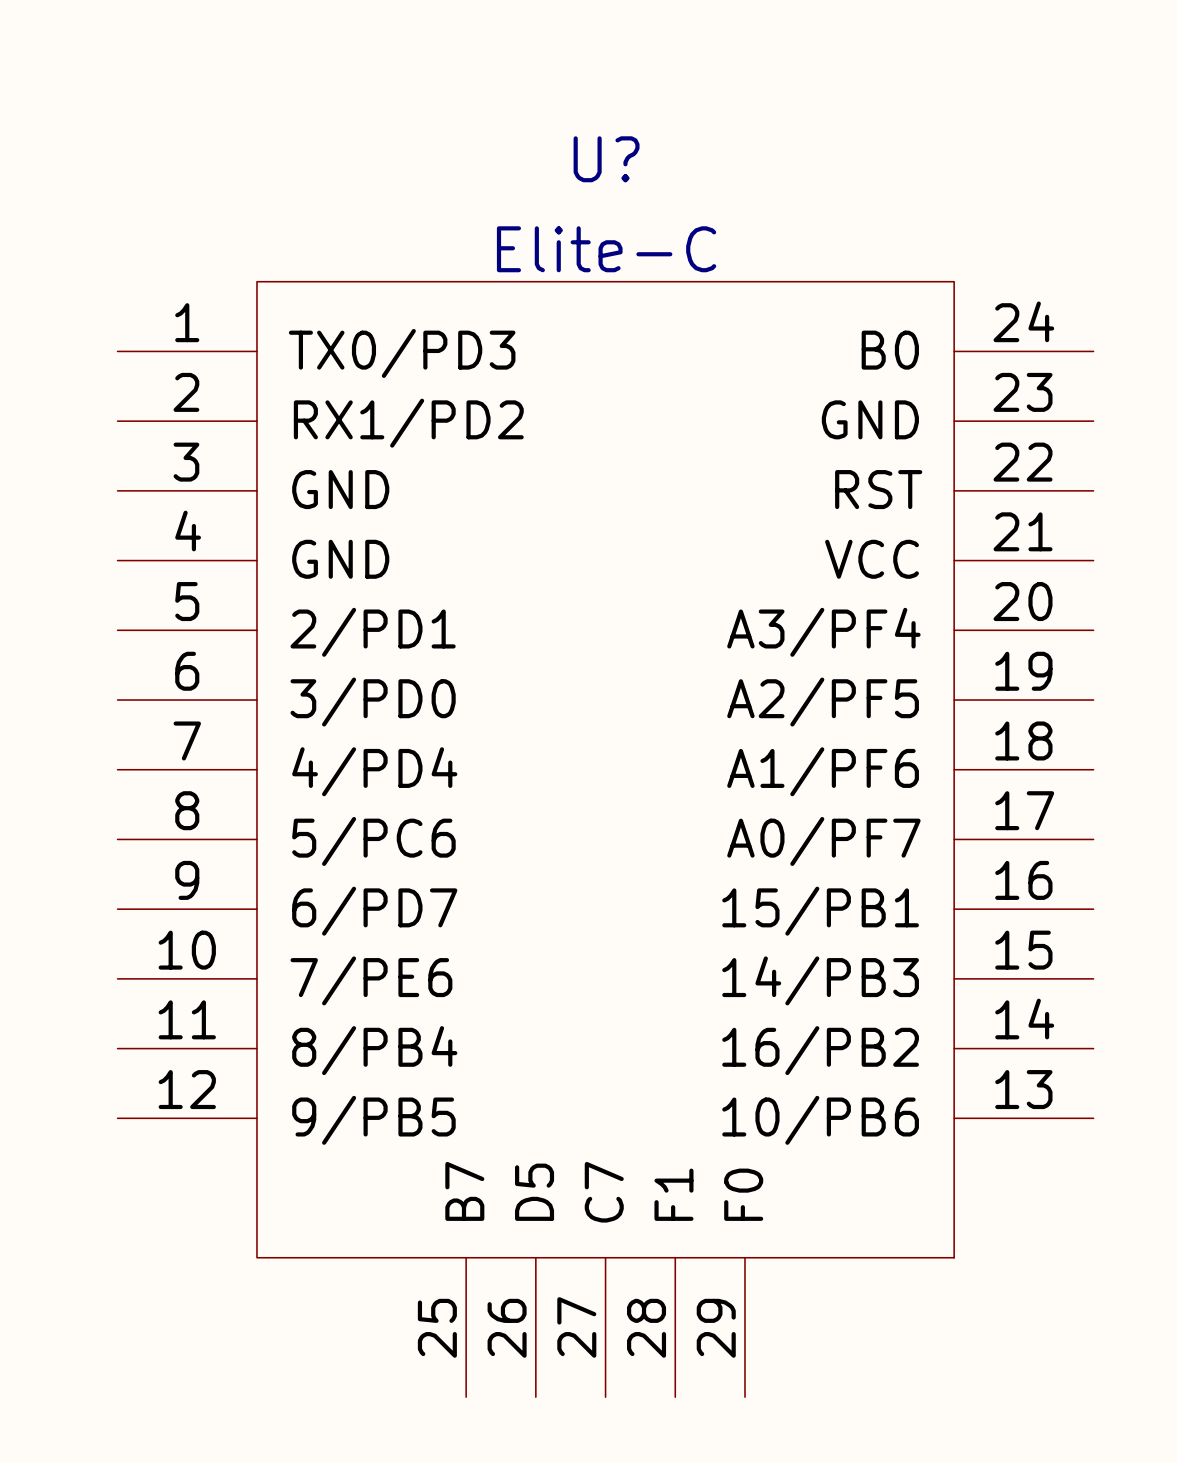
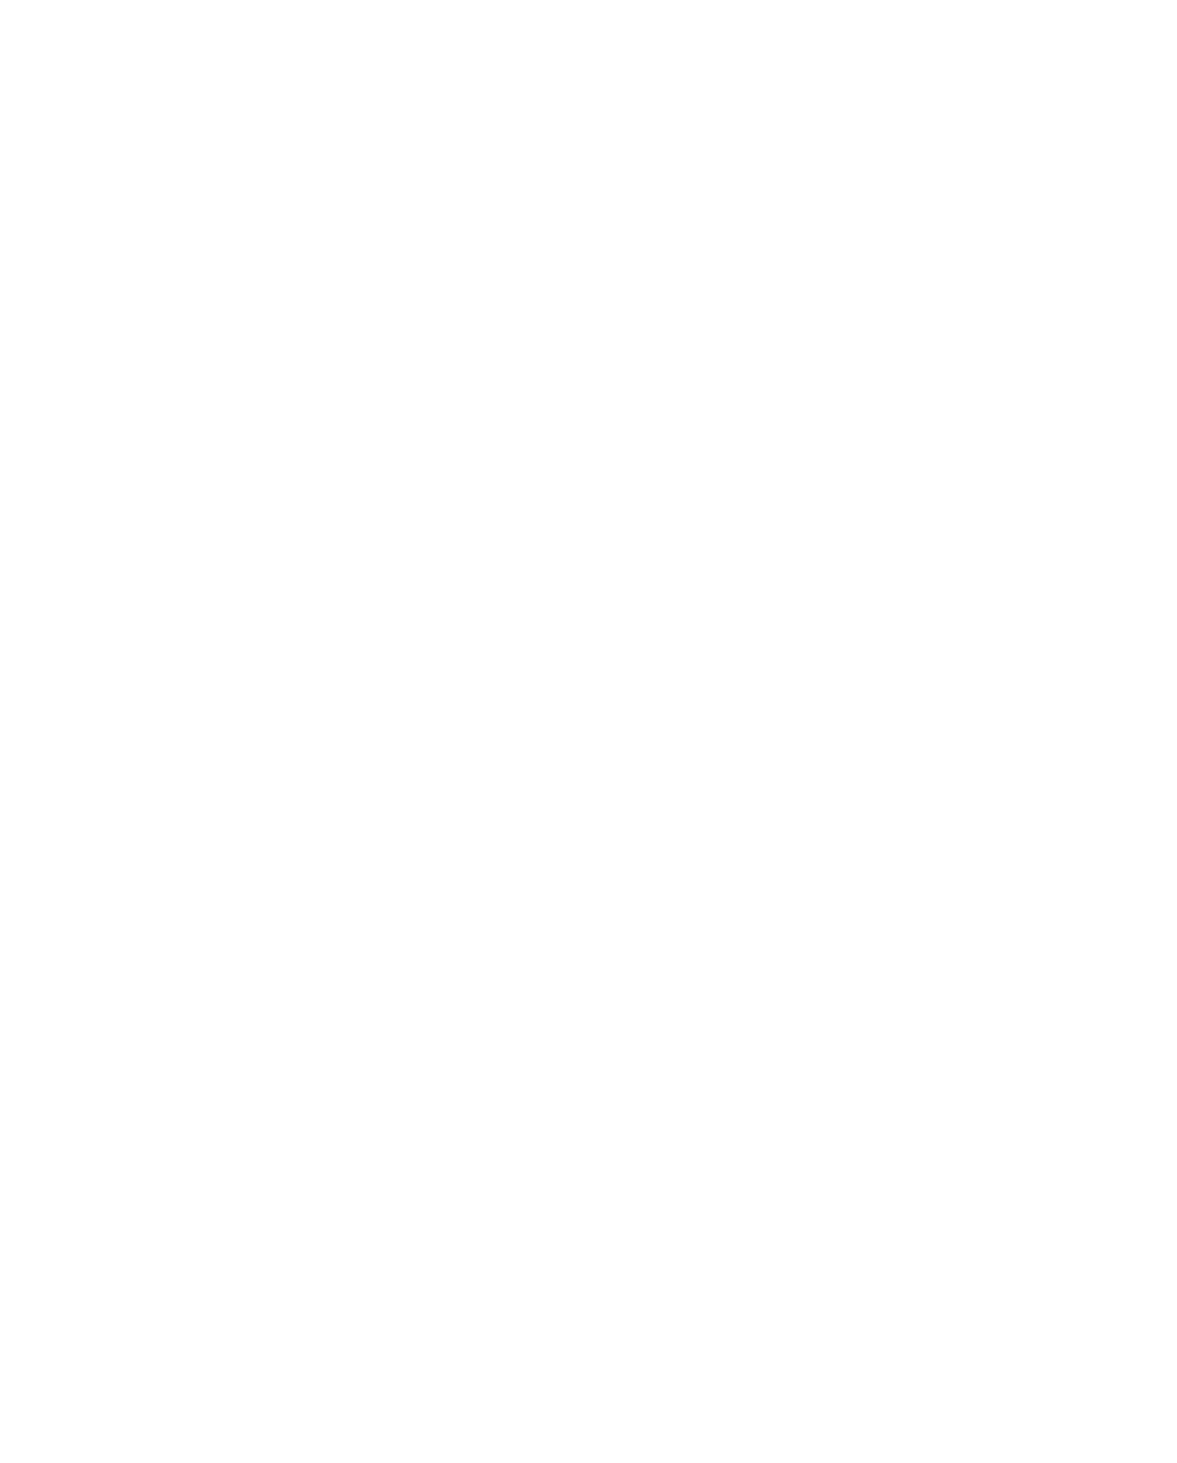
U?: Elite-C (605, 839) -> none

